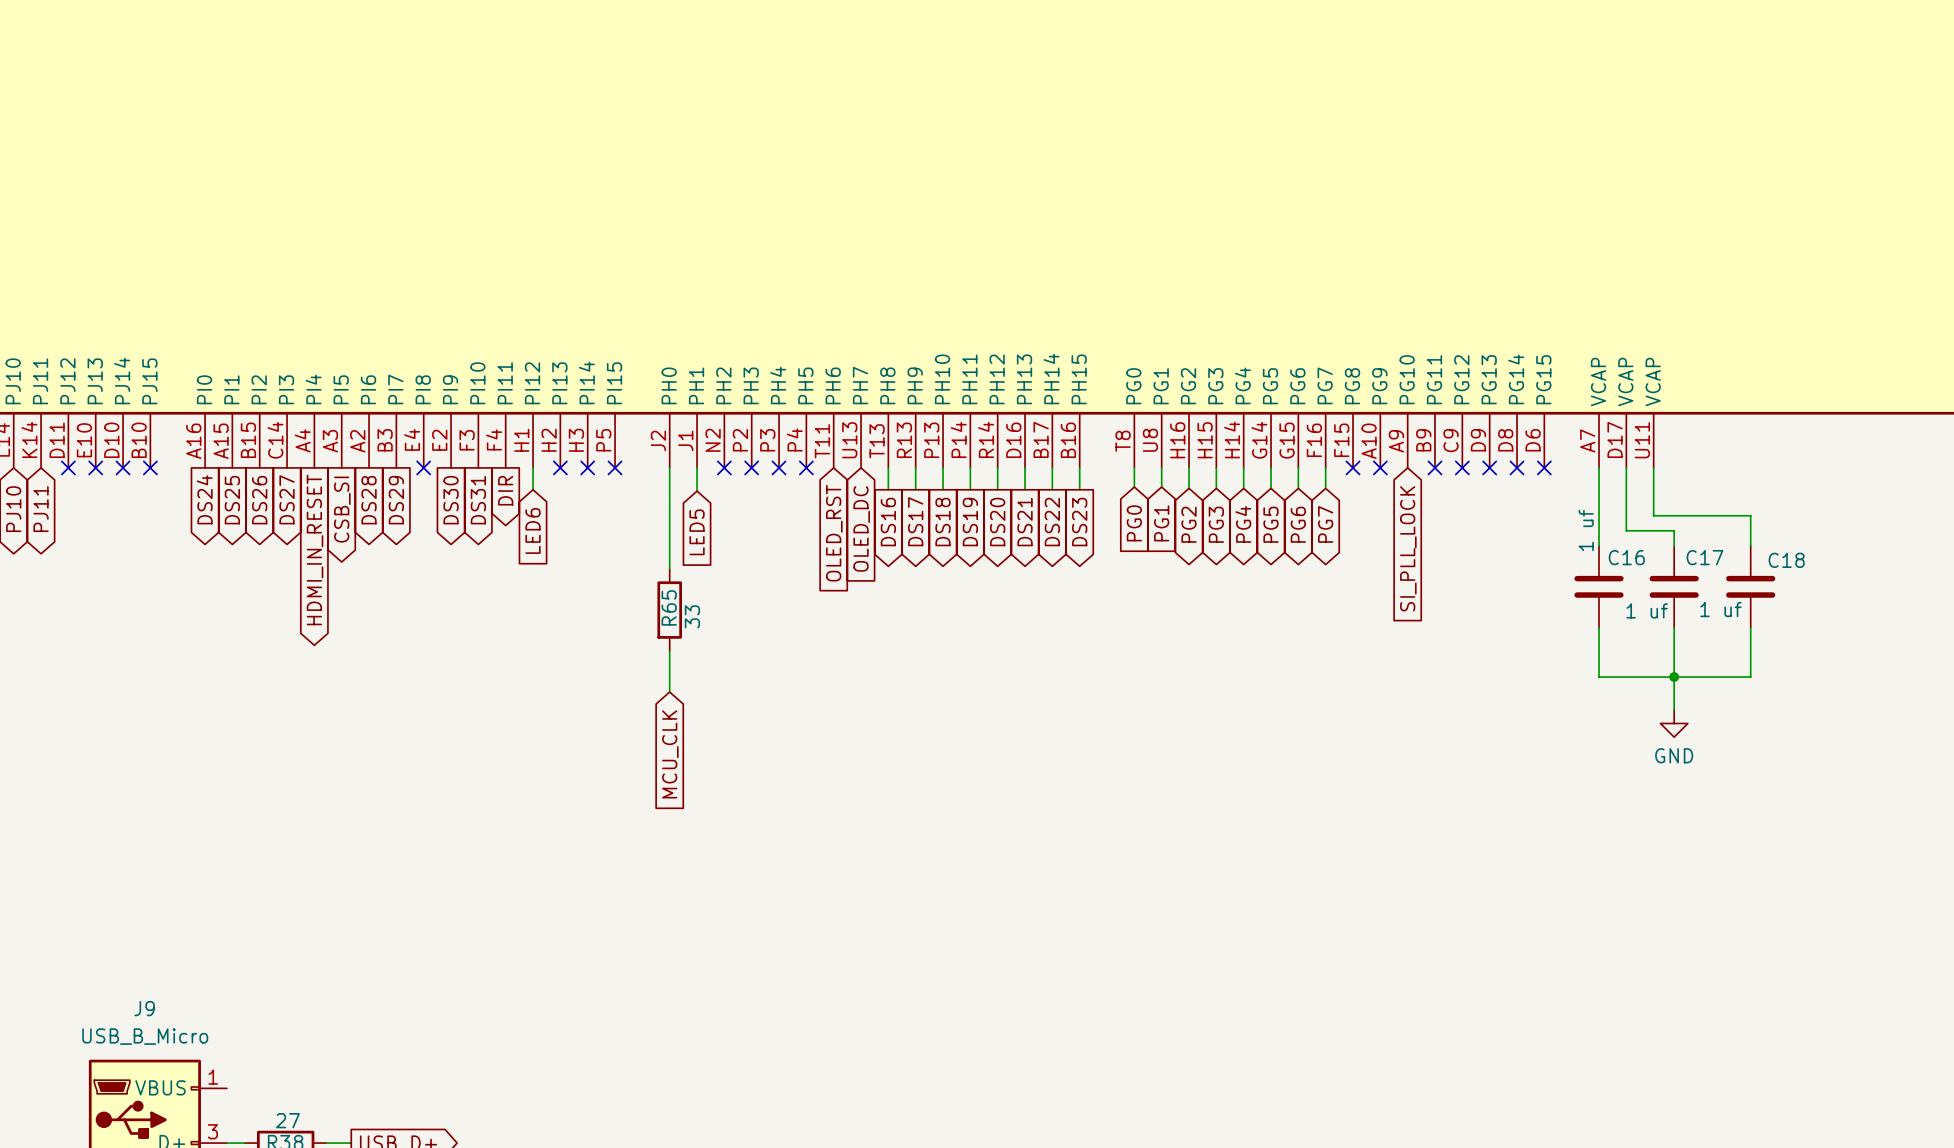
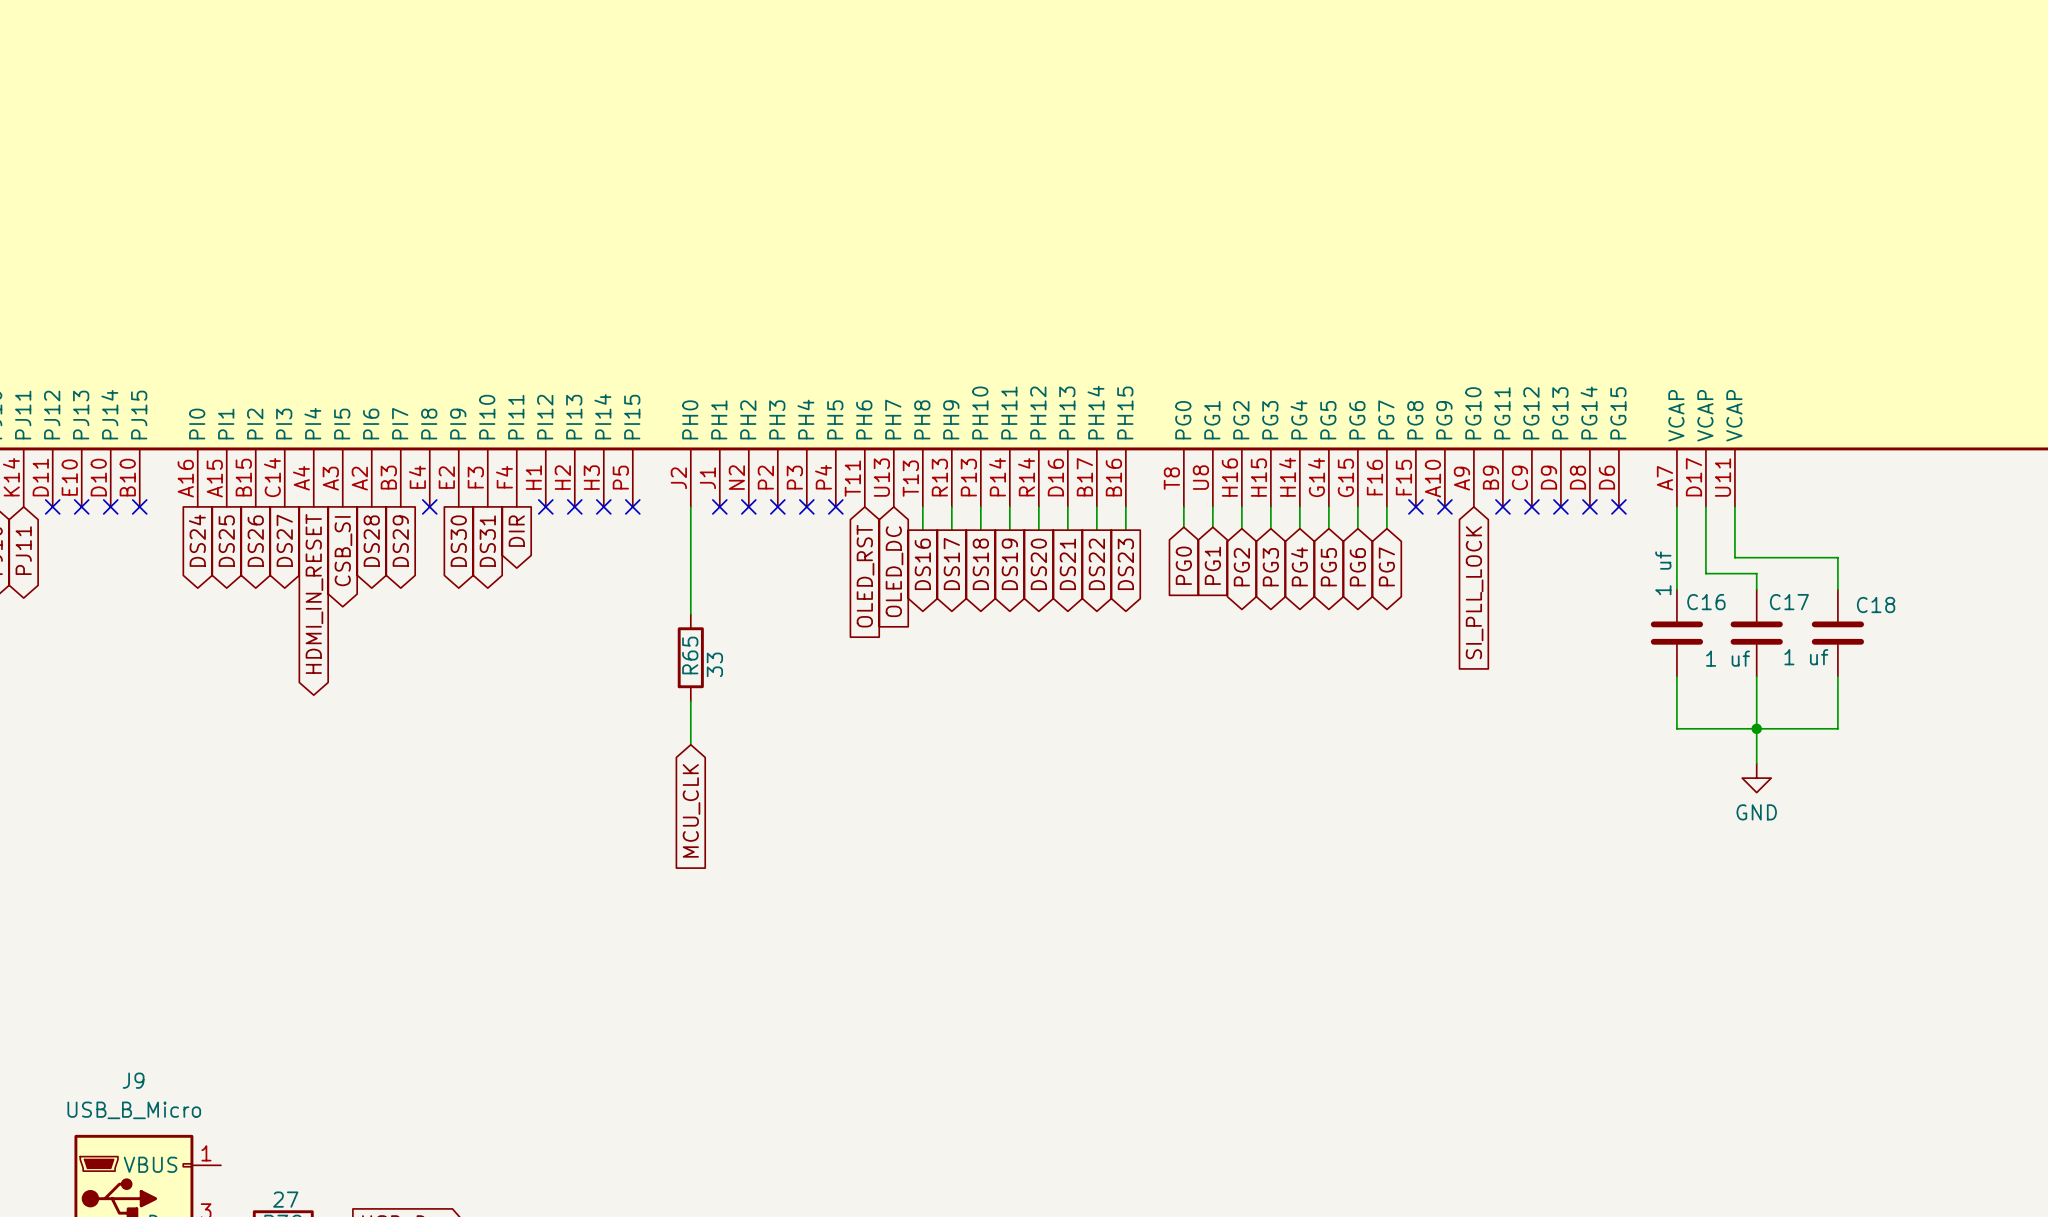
wire: (533, 467) (533, 489) -> none
no-connect mark: none -> (545, 506)
wire: (697, 467) (697, 491) -> none
no-connect mark: none -> (719, 506)
global label: LED6 (533, 530) -> none
global label: LED5 (697, 532) -> none

